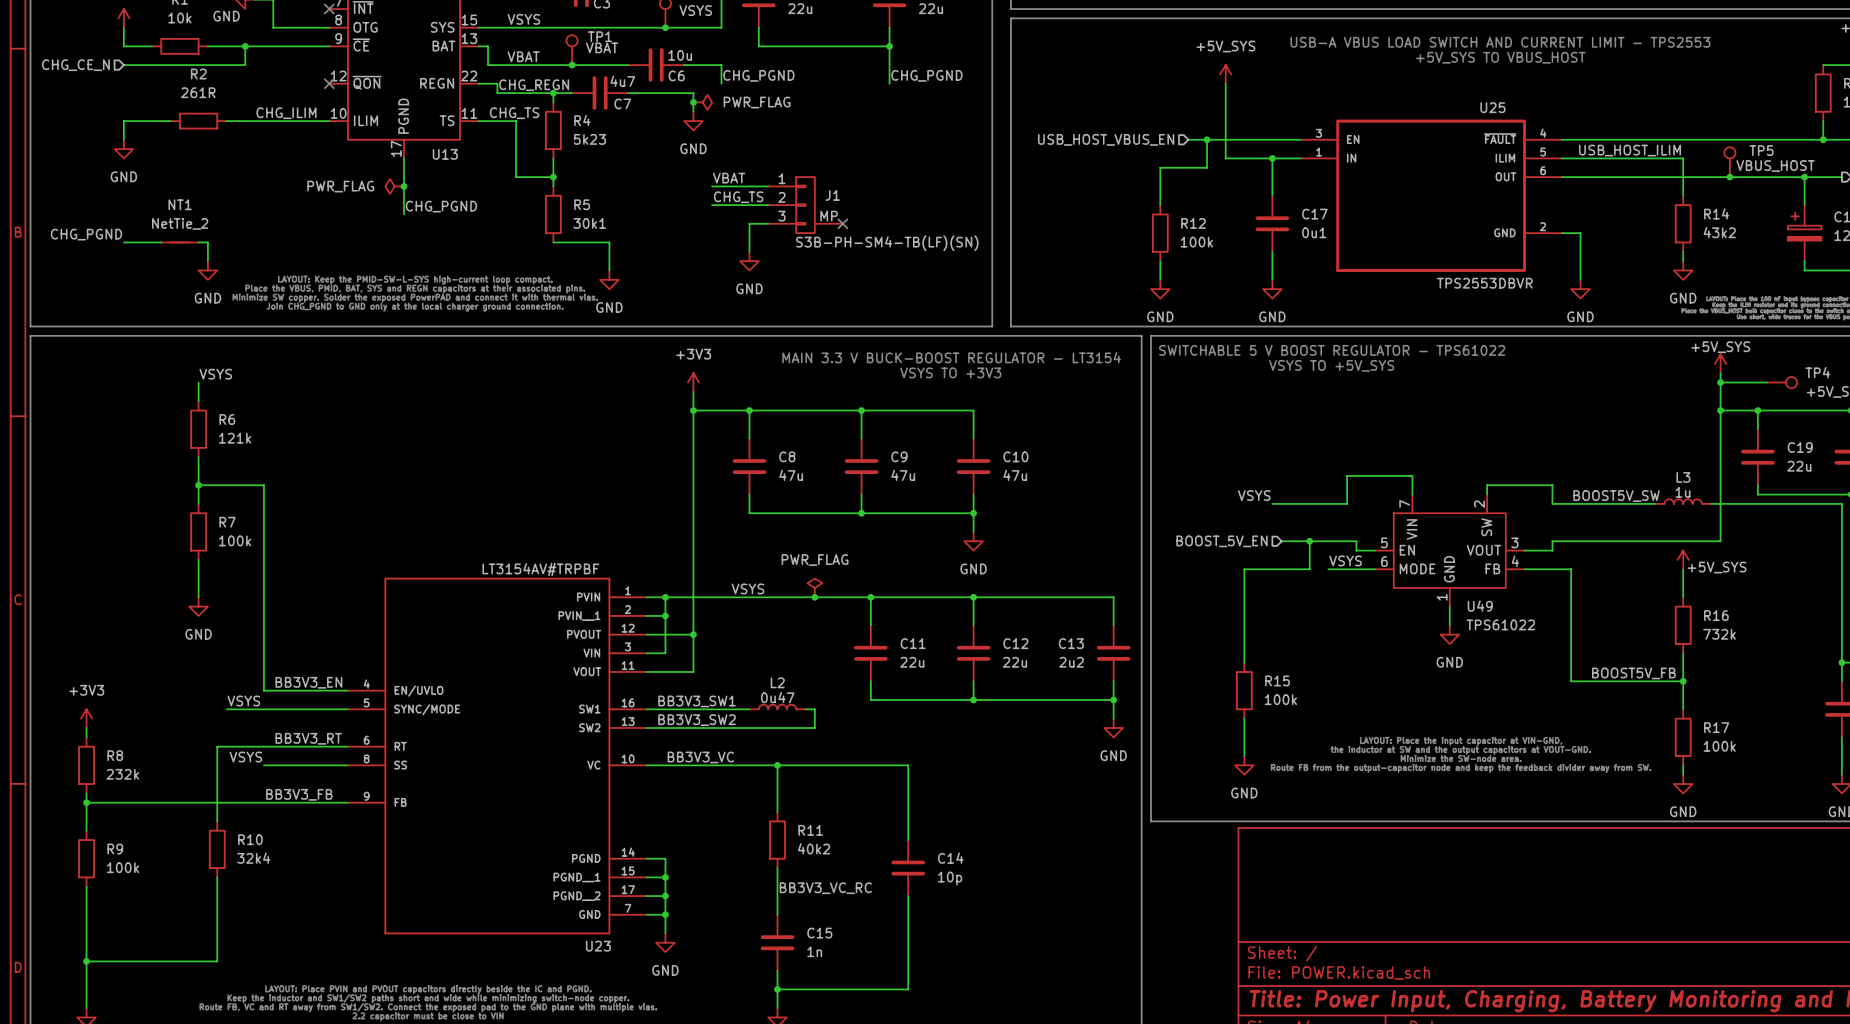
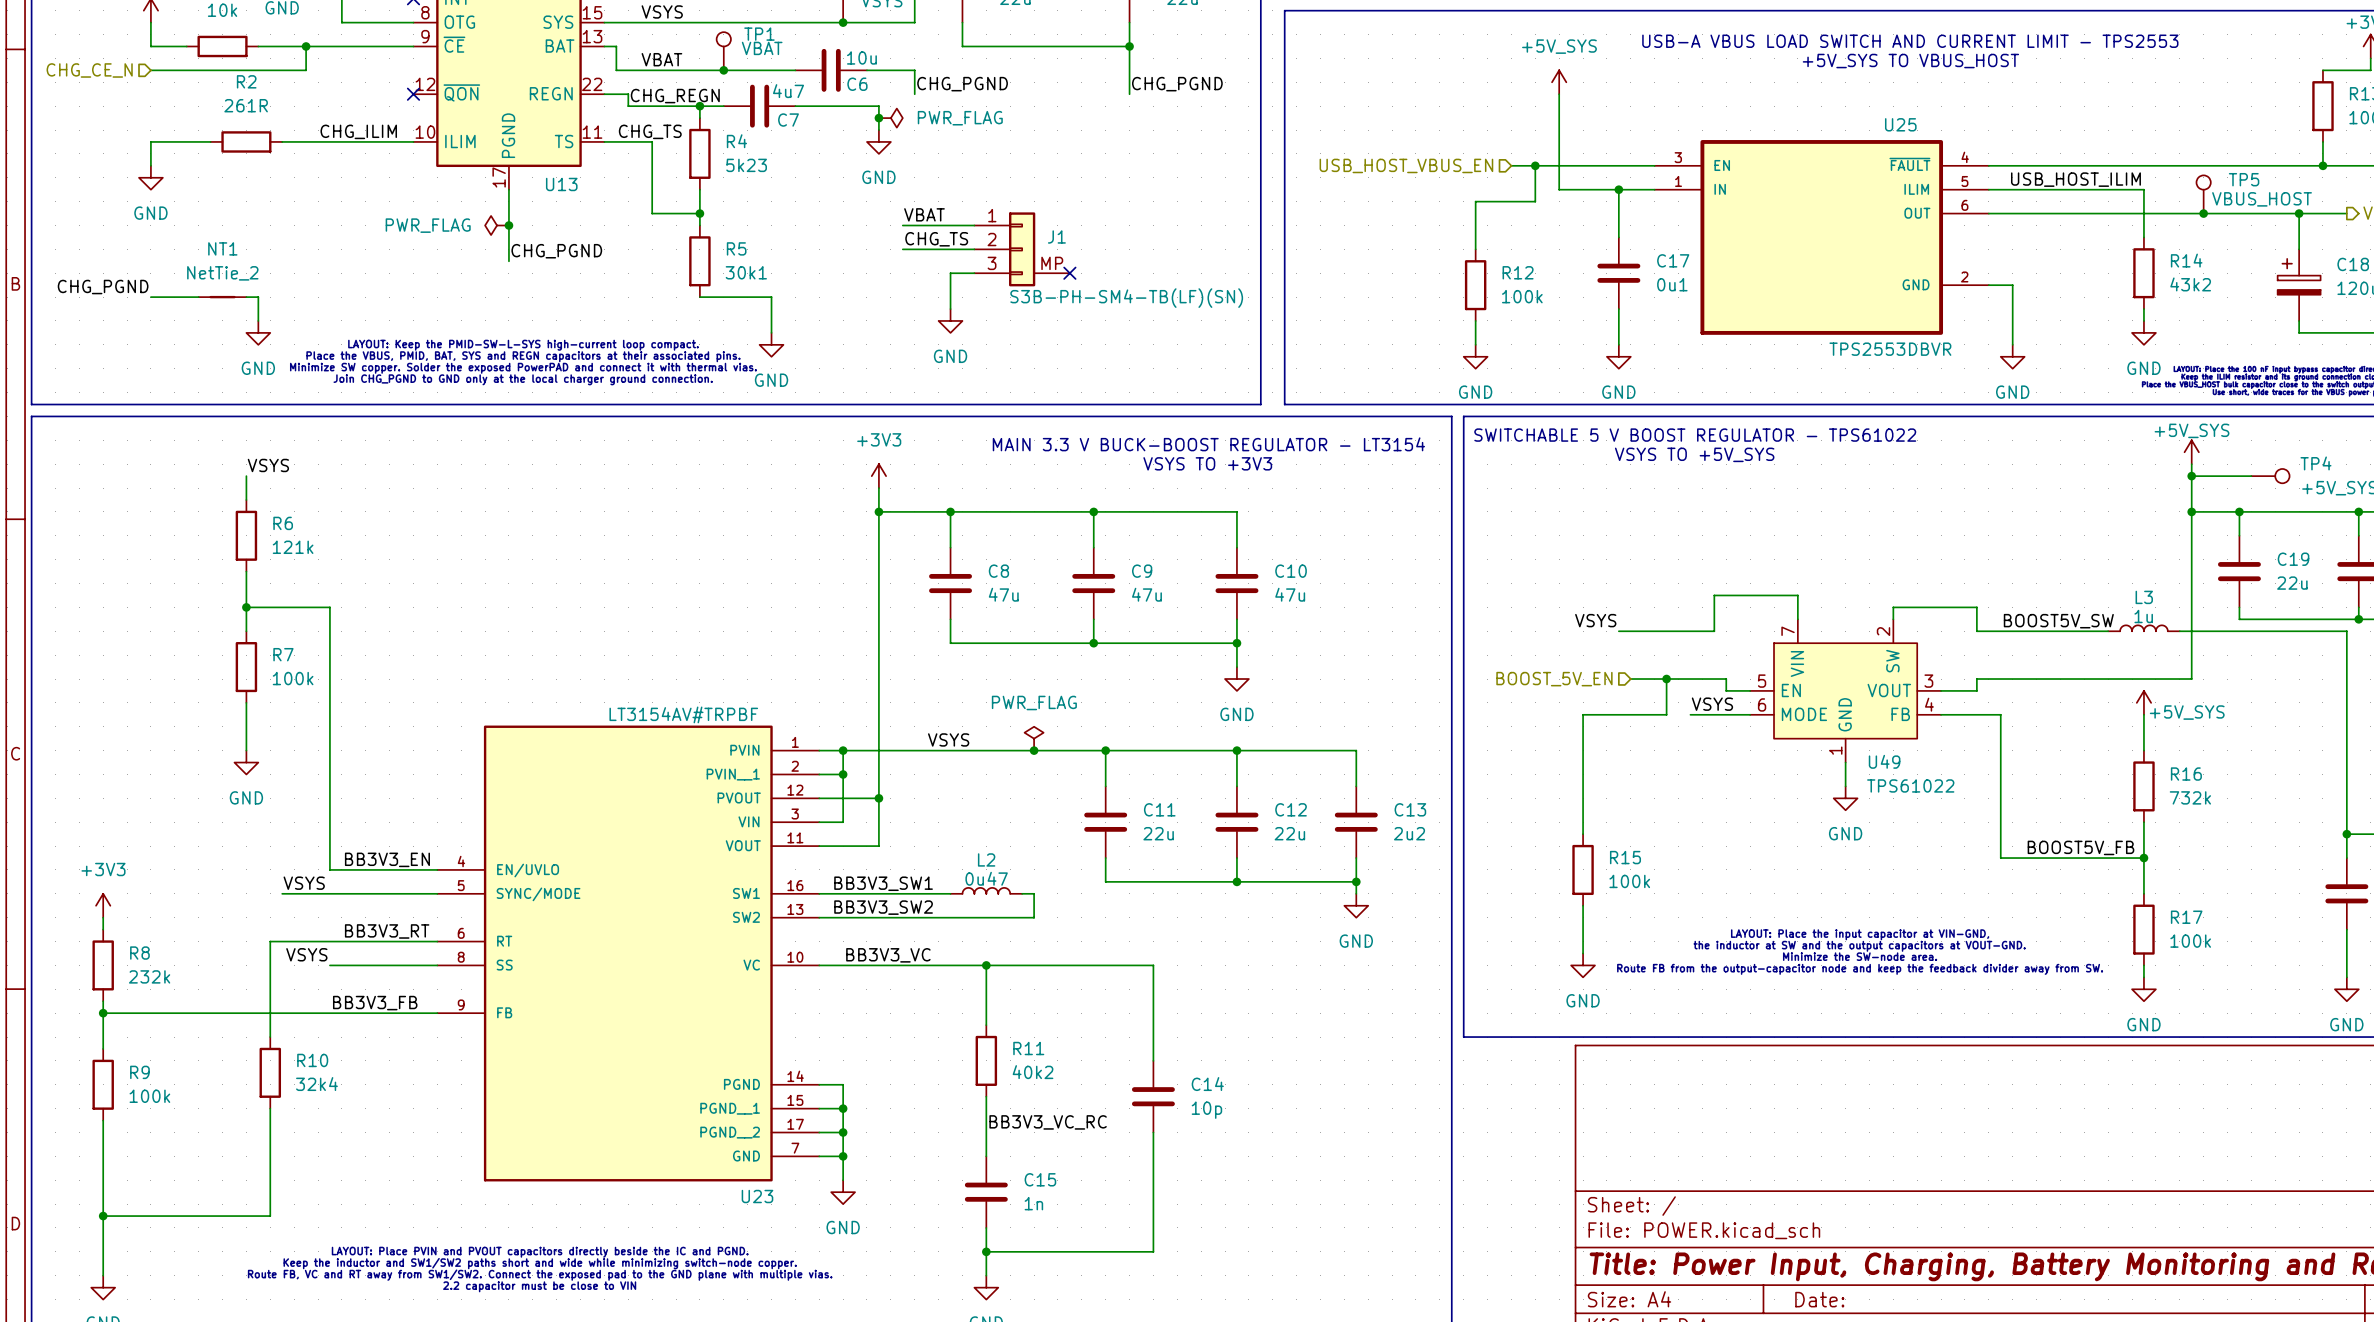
wire: (1066, 597) (1113, 597) (1113, 625) -> (1356, 750) (1356, 786)
C13 name position: C13 (1071, 643) -> C13 (1410, 809)
C13 position: (1113, 653) -> (1356, 822)
C13 value position: 2u2 (1071, 662) -> 2u2 (1409, 833)
wire: none -> (1356, 858) (1356, 893)
wire: (1113, 681) (1113, 718) -> none
wire: (1066, 699) (1113, 699) -> none
junction: none -> (1356, 881)
junction: (1113, 699) -> none
power symbol position: GND (1113, 728) -> GND (1356, 905)

